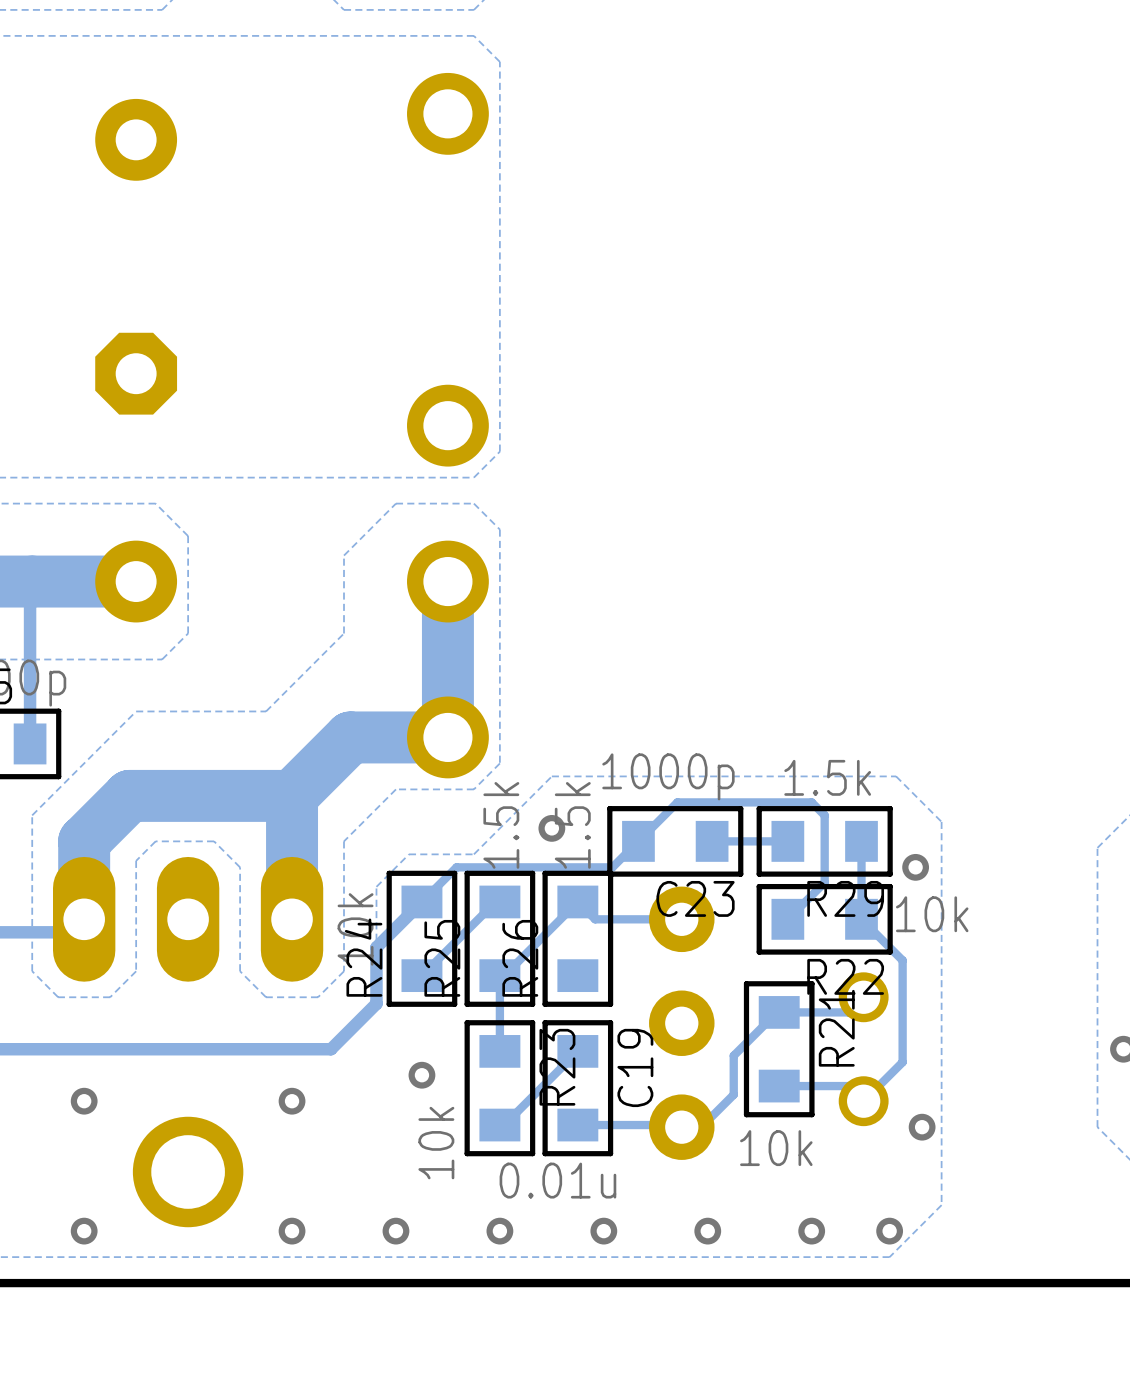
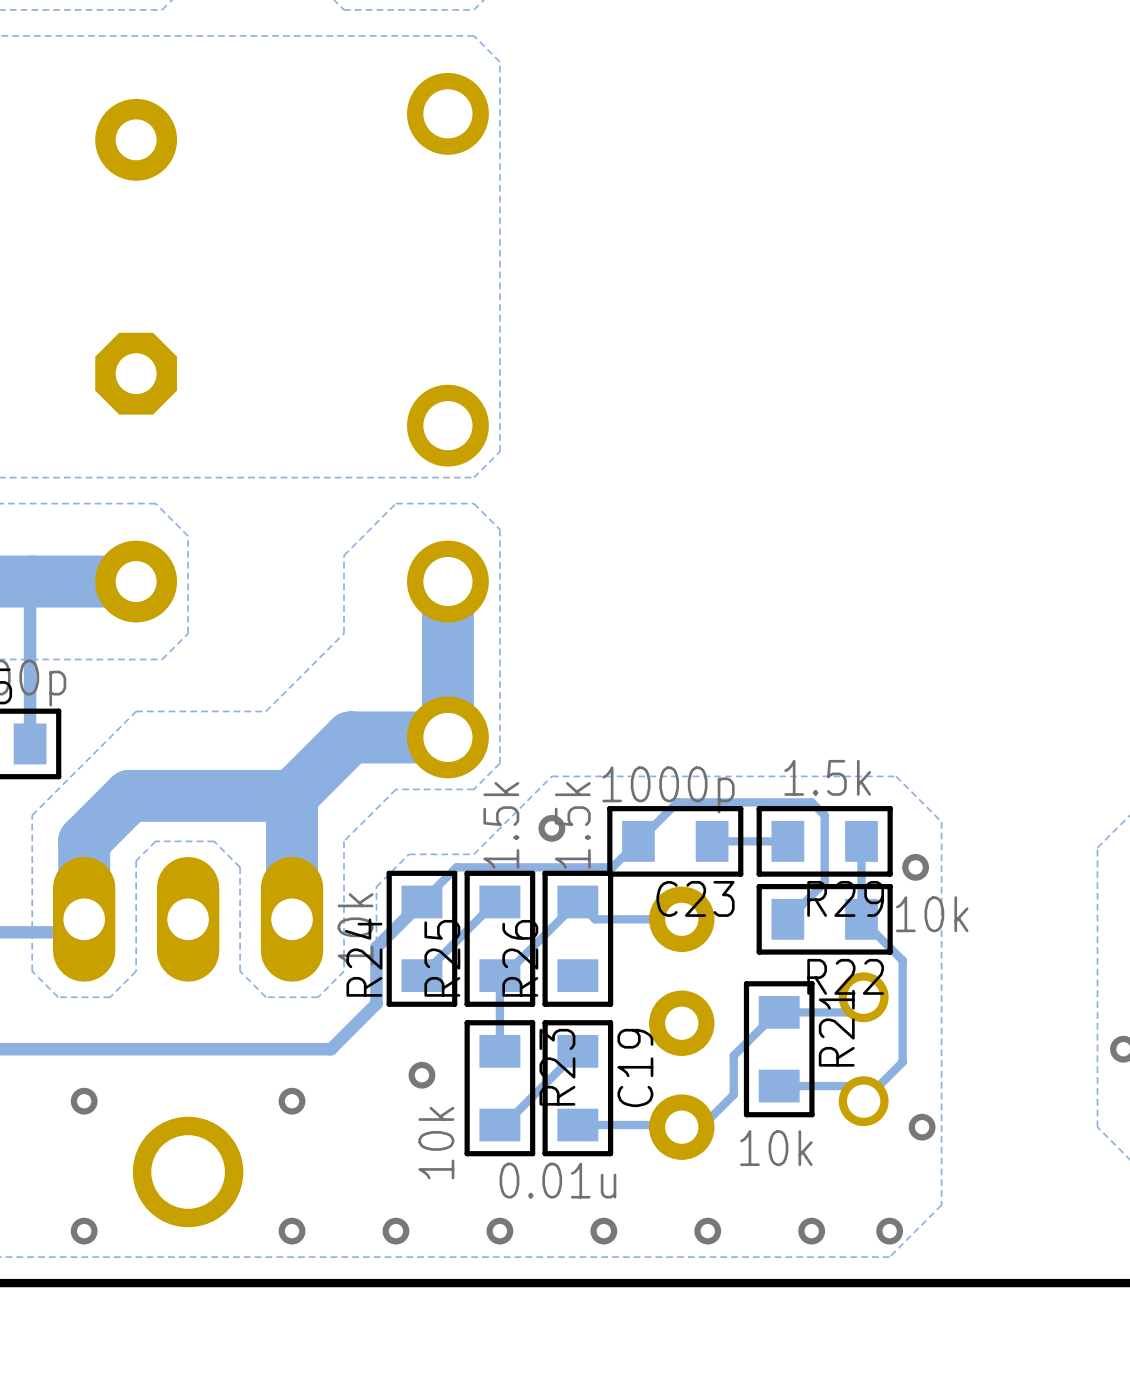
C23 value position: 1000p (668, 776) -> 1000p (668, 789)

